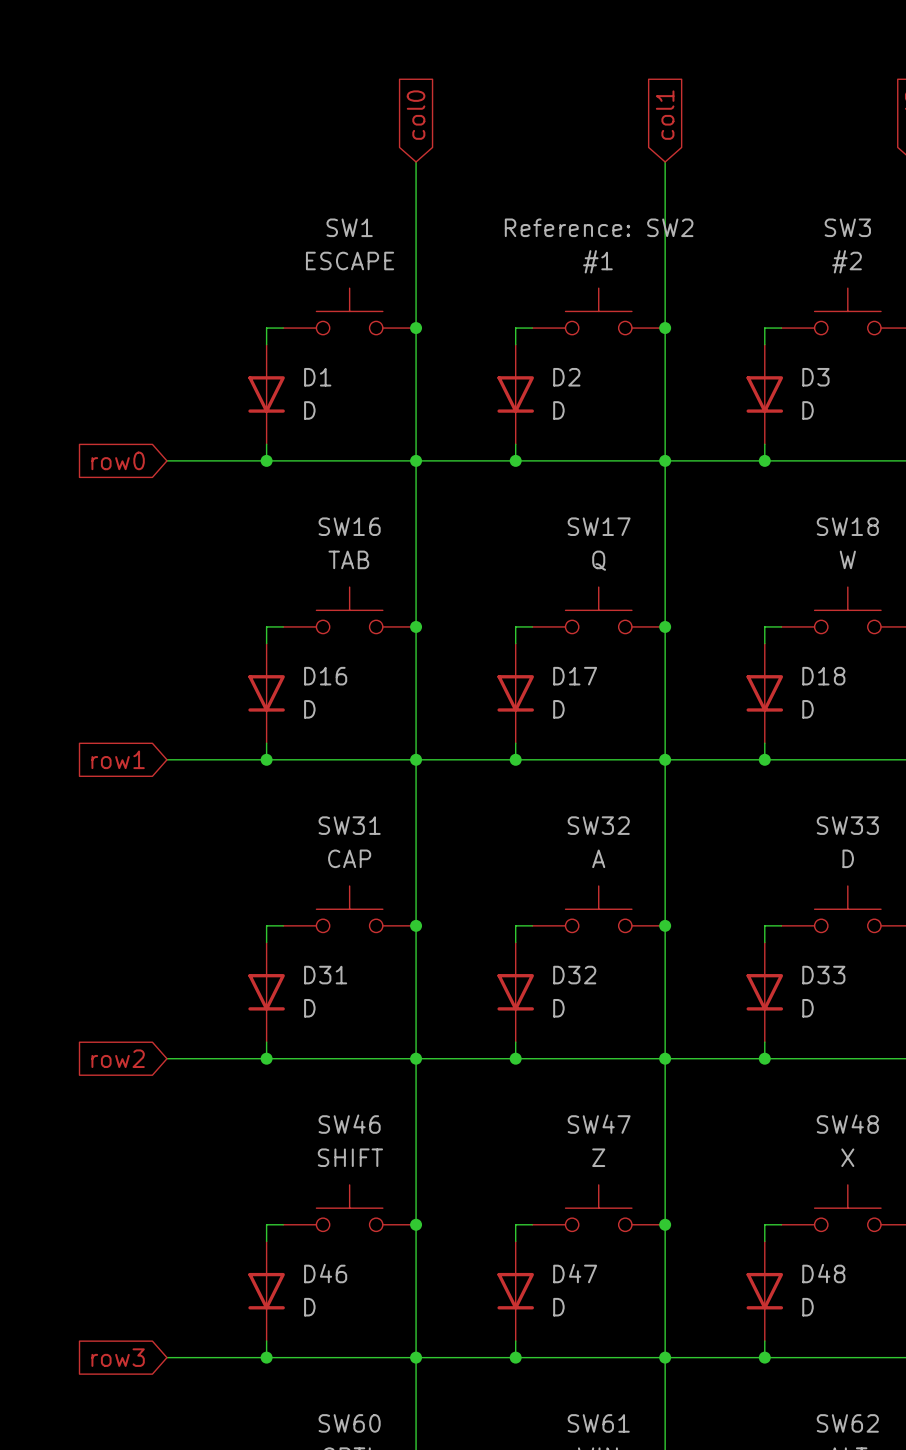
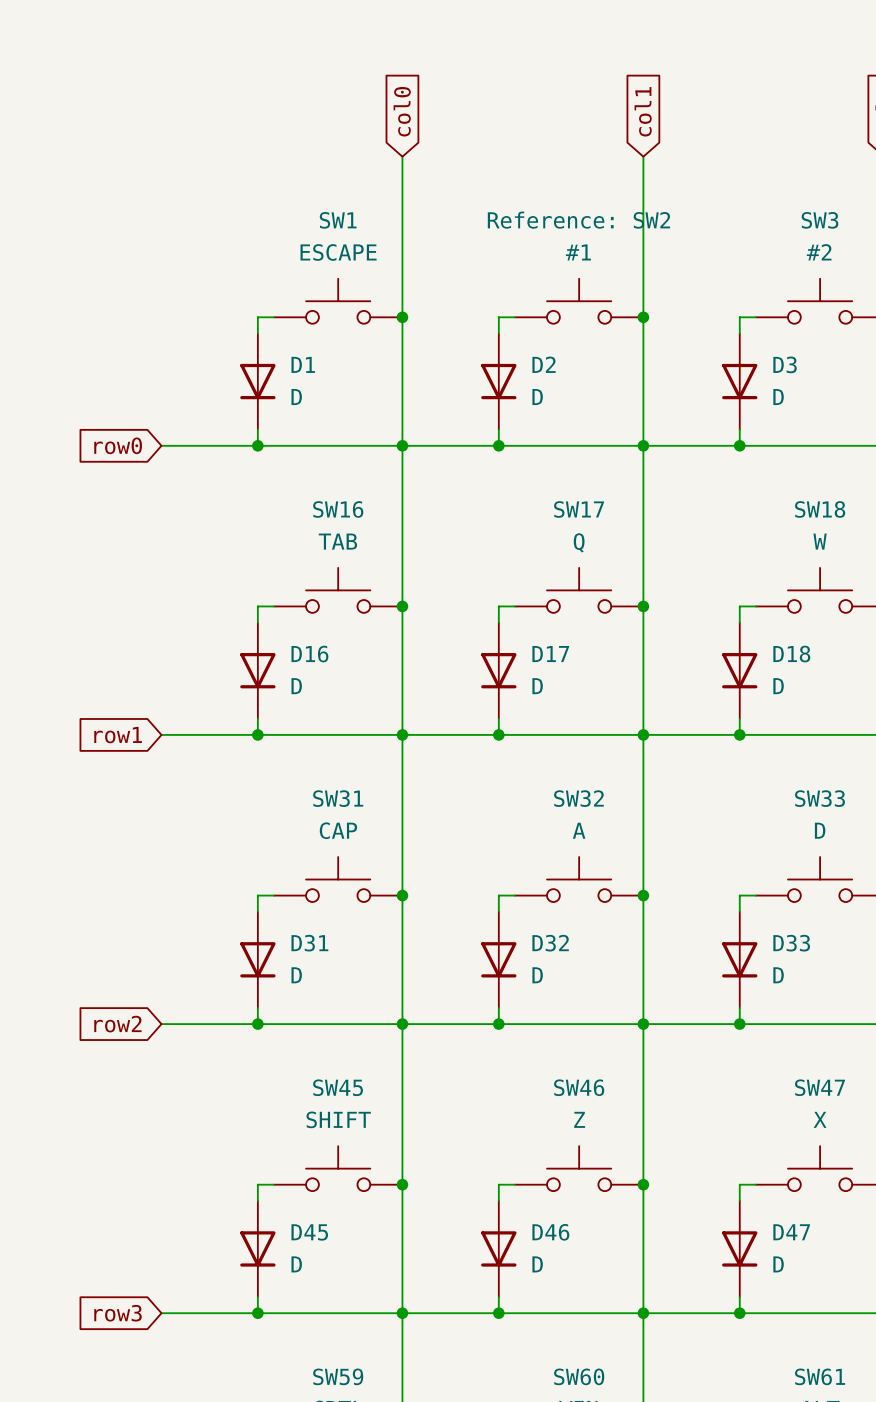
SW46 name: SW46 (349, 1124) -> SW45 (338, 1087)
SW47 name: SW47 (599, 1124) -> SW46 (579, 1087)
SW48 name: SW48 (847, 1124) -> SW47 (819, 1087)
D46 name: D46 (325, 1273) -> D45 (309, 1232)
D47 name: D47 (575, 1273) -> D46 (550, 1232)
D48 name: D48 (823, 1273) -> D47 (791, 1232)
SW60 name: SW60 (349, 1423) -> SW59 (338, 1376)
SW61 name: SW61 (598, 1423) -> SW60 (579, 1376)
SW62 name: SW62 (847, 1423) -> SW61 (820, 1376)

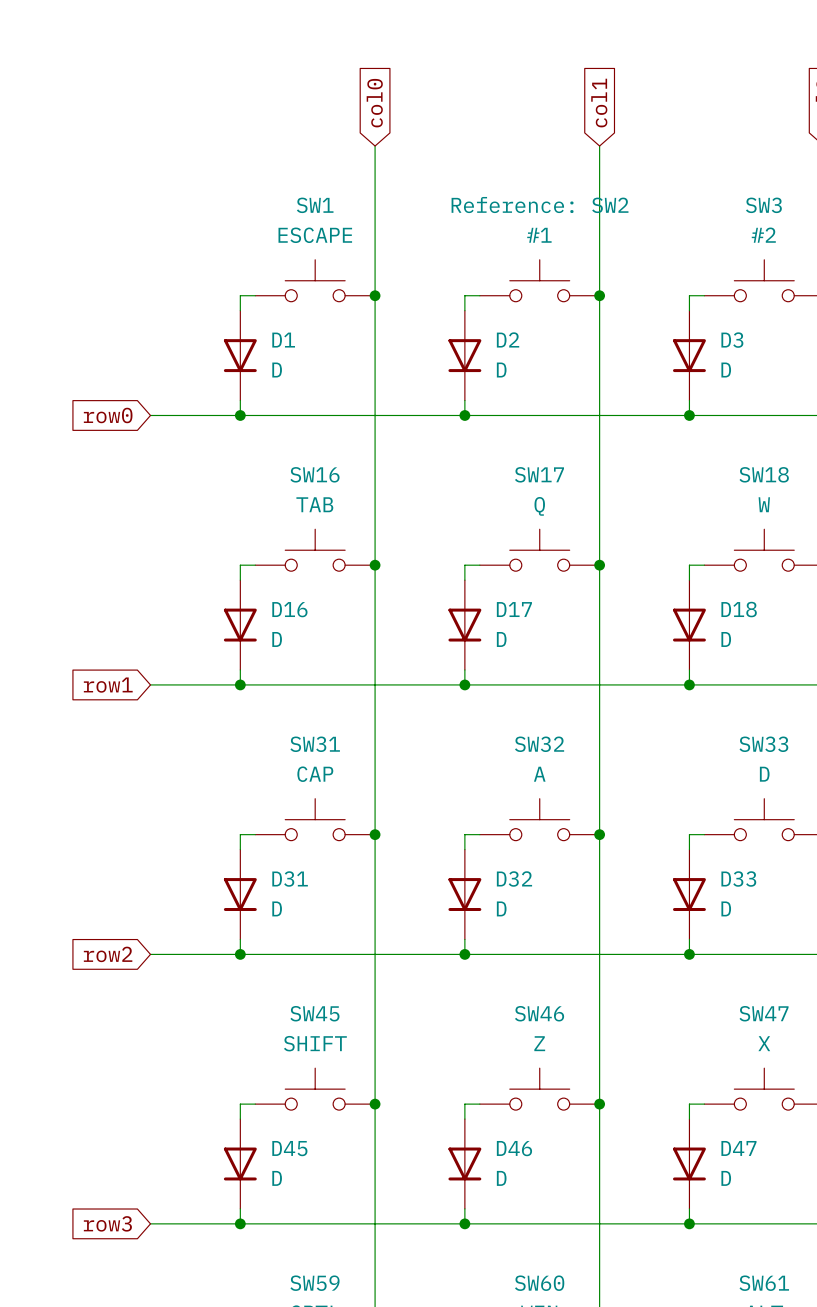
junction: (402, 445) -> none
junction: (643, 445) -> none
junction: (402, 734) -> none
junction: (643, 734) -> none
junction: (402, 1024) -> none
junction: (643, 1024) -> none
junction: (402, 1313) -> none
junction: (643, 1313) -> none

